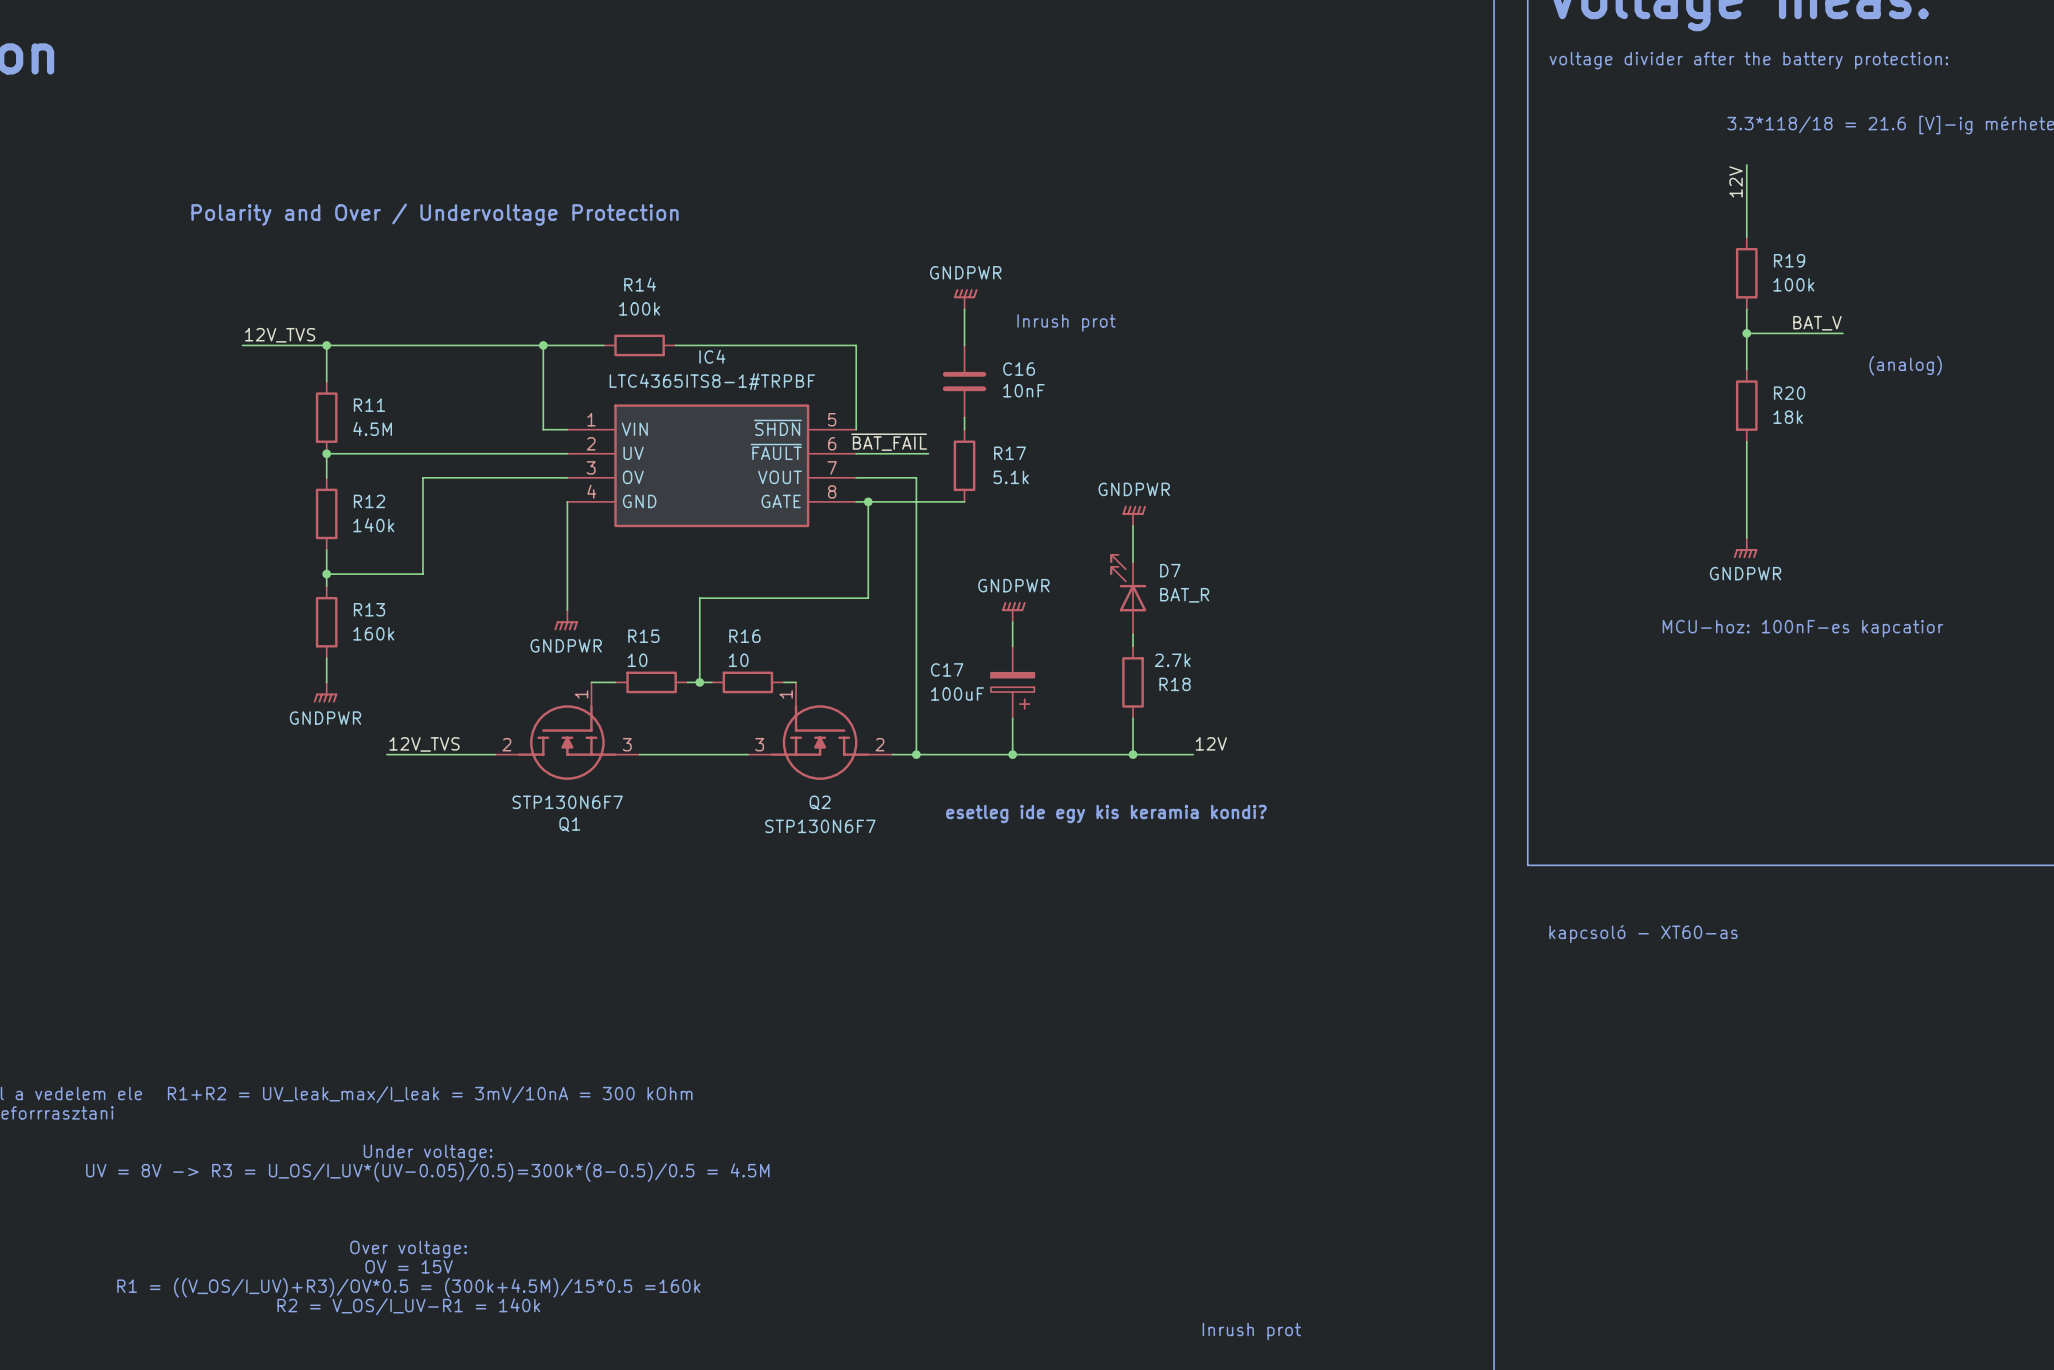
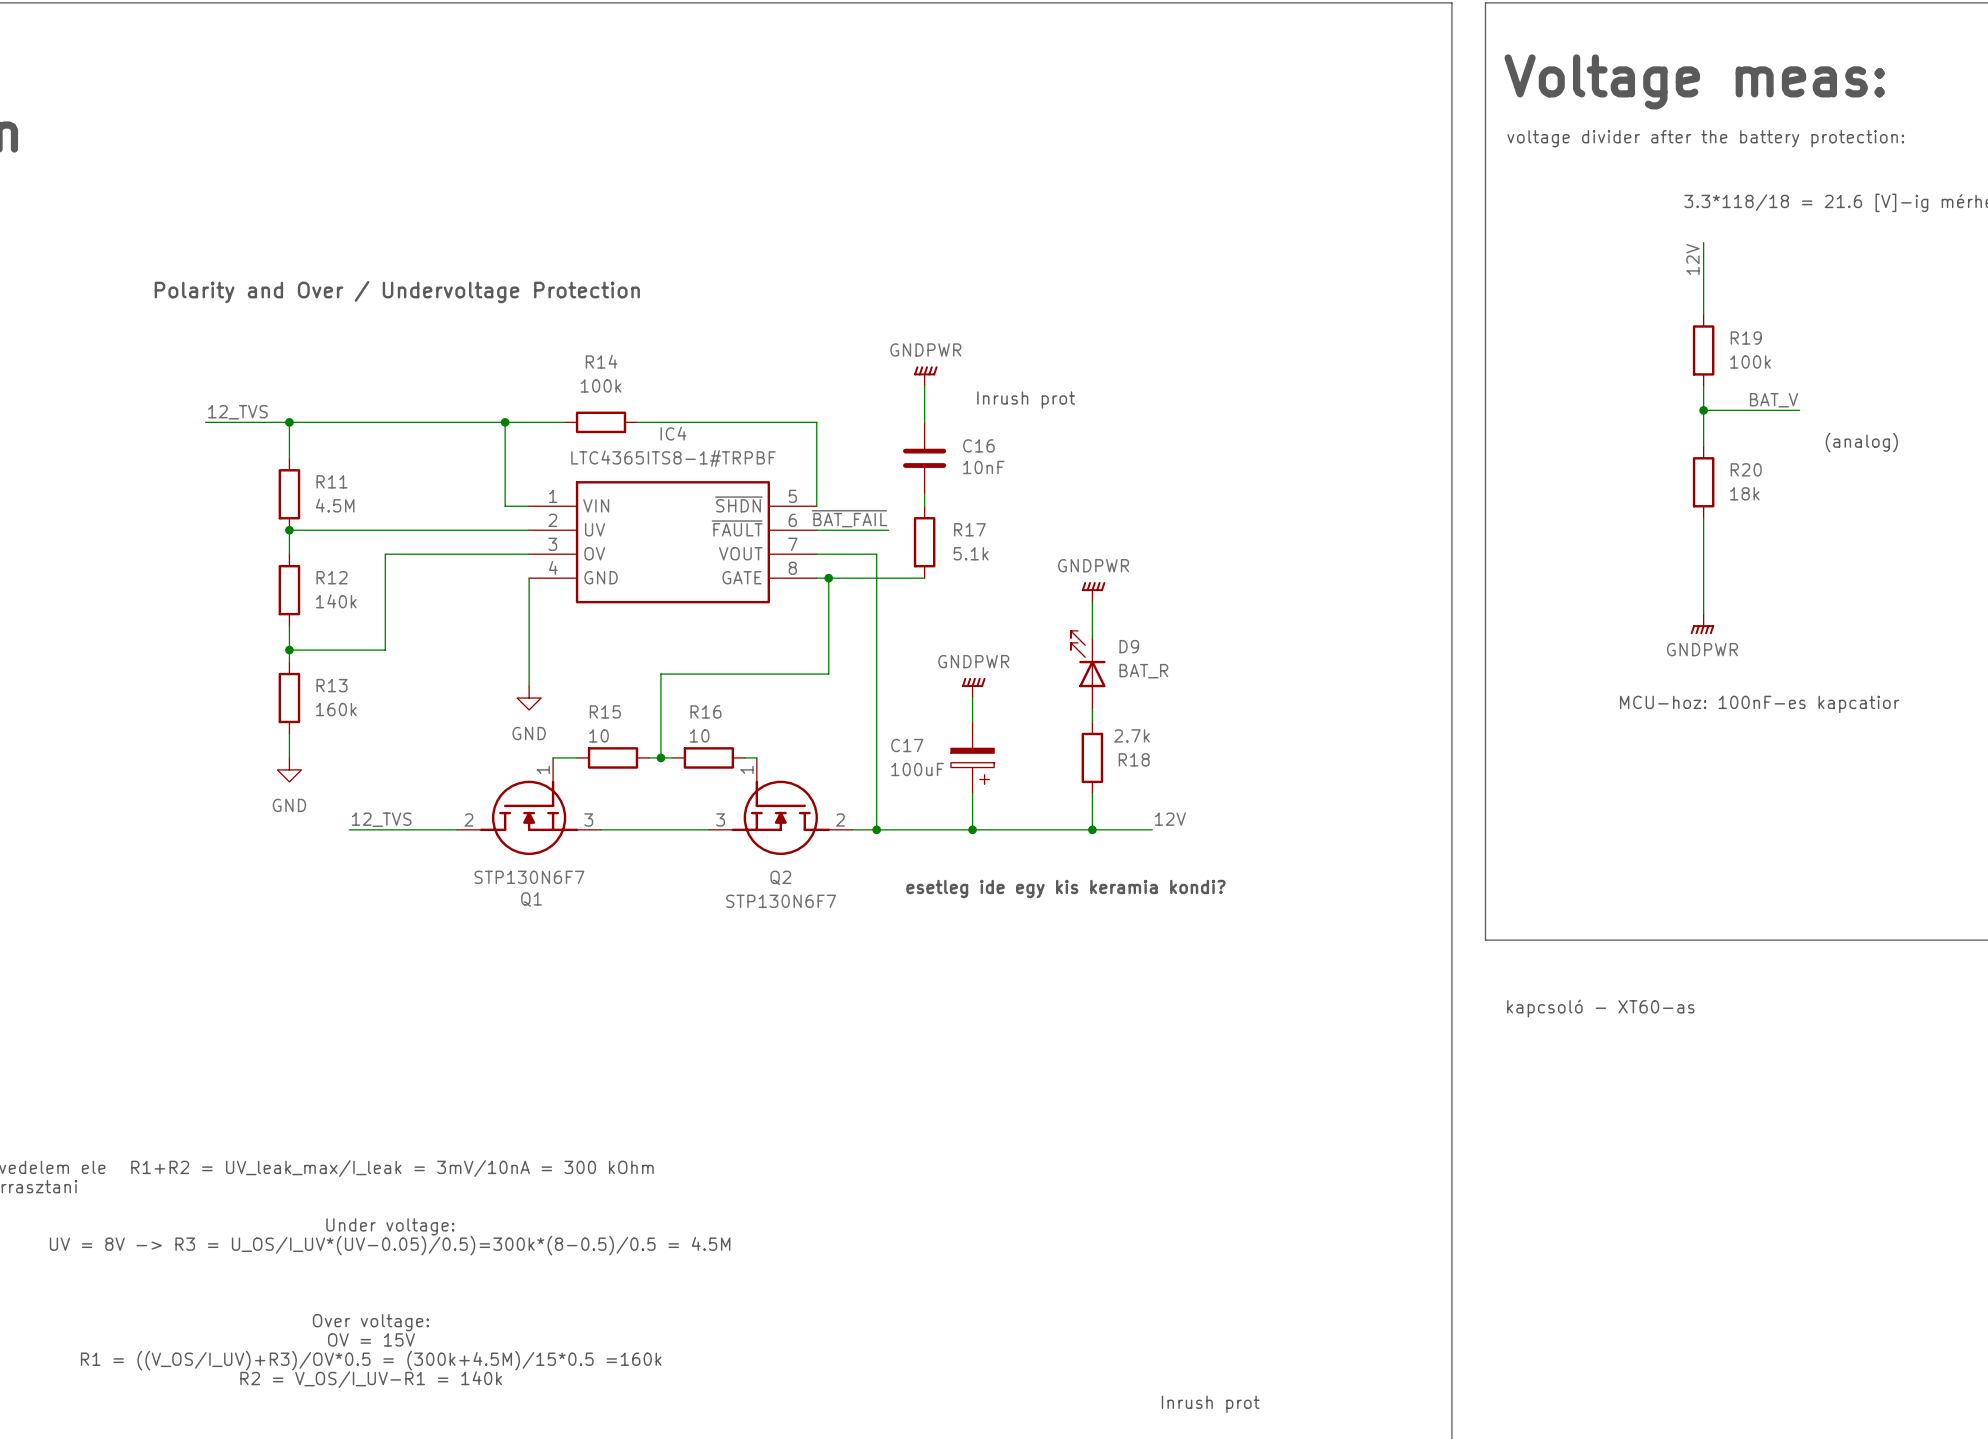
label: 12V_TVS (280, 335) -> 12_TVS (237, 412)
D7 name: D7 (1170, 570) -> D9 (1129, 646)
power symbol: GNDPWR (566, 620) -> GND (529, 698)
power symbol: GNDPWR (325, 692) -> GND (289, 769)
label: 12V_TVS (424, 744) -> 12_TVS (381, 819)

